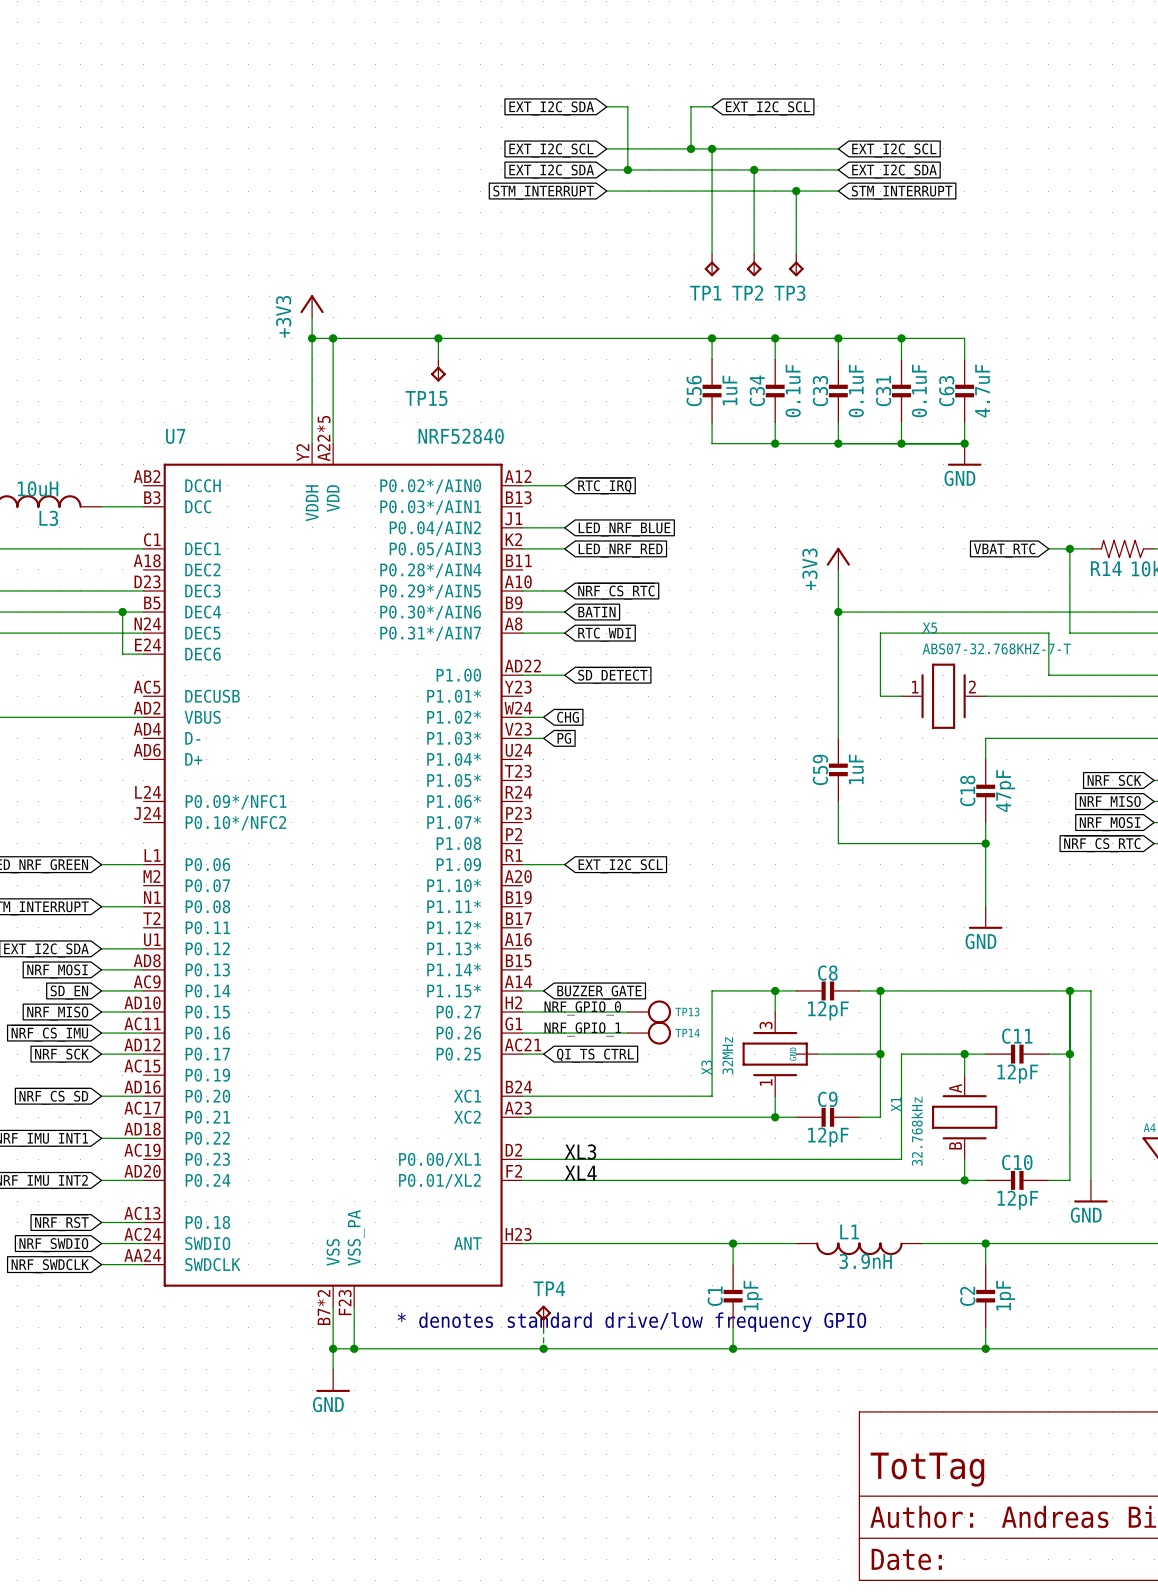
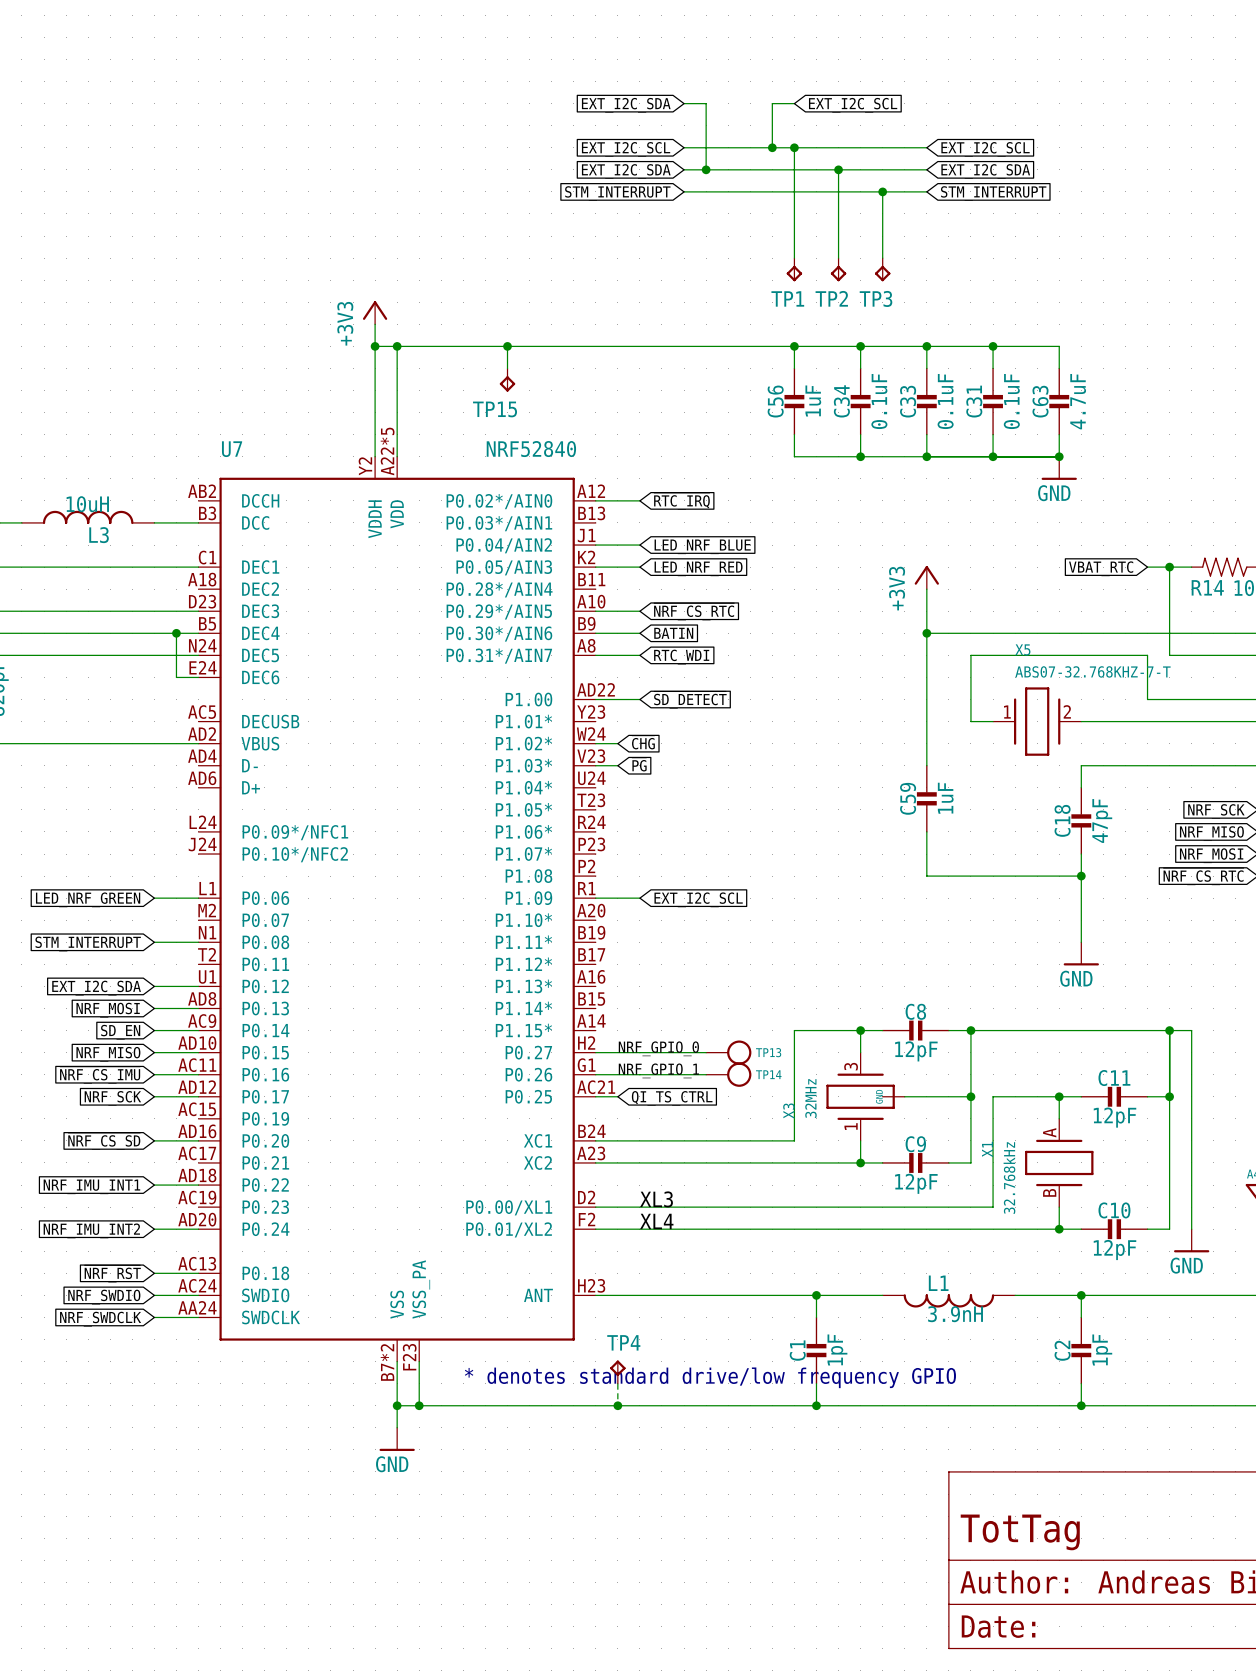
wire: (522, 990) (543, 990) -> none
global label: BUZZER_GATE (599, 992) -> none

